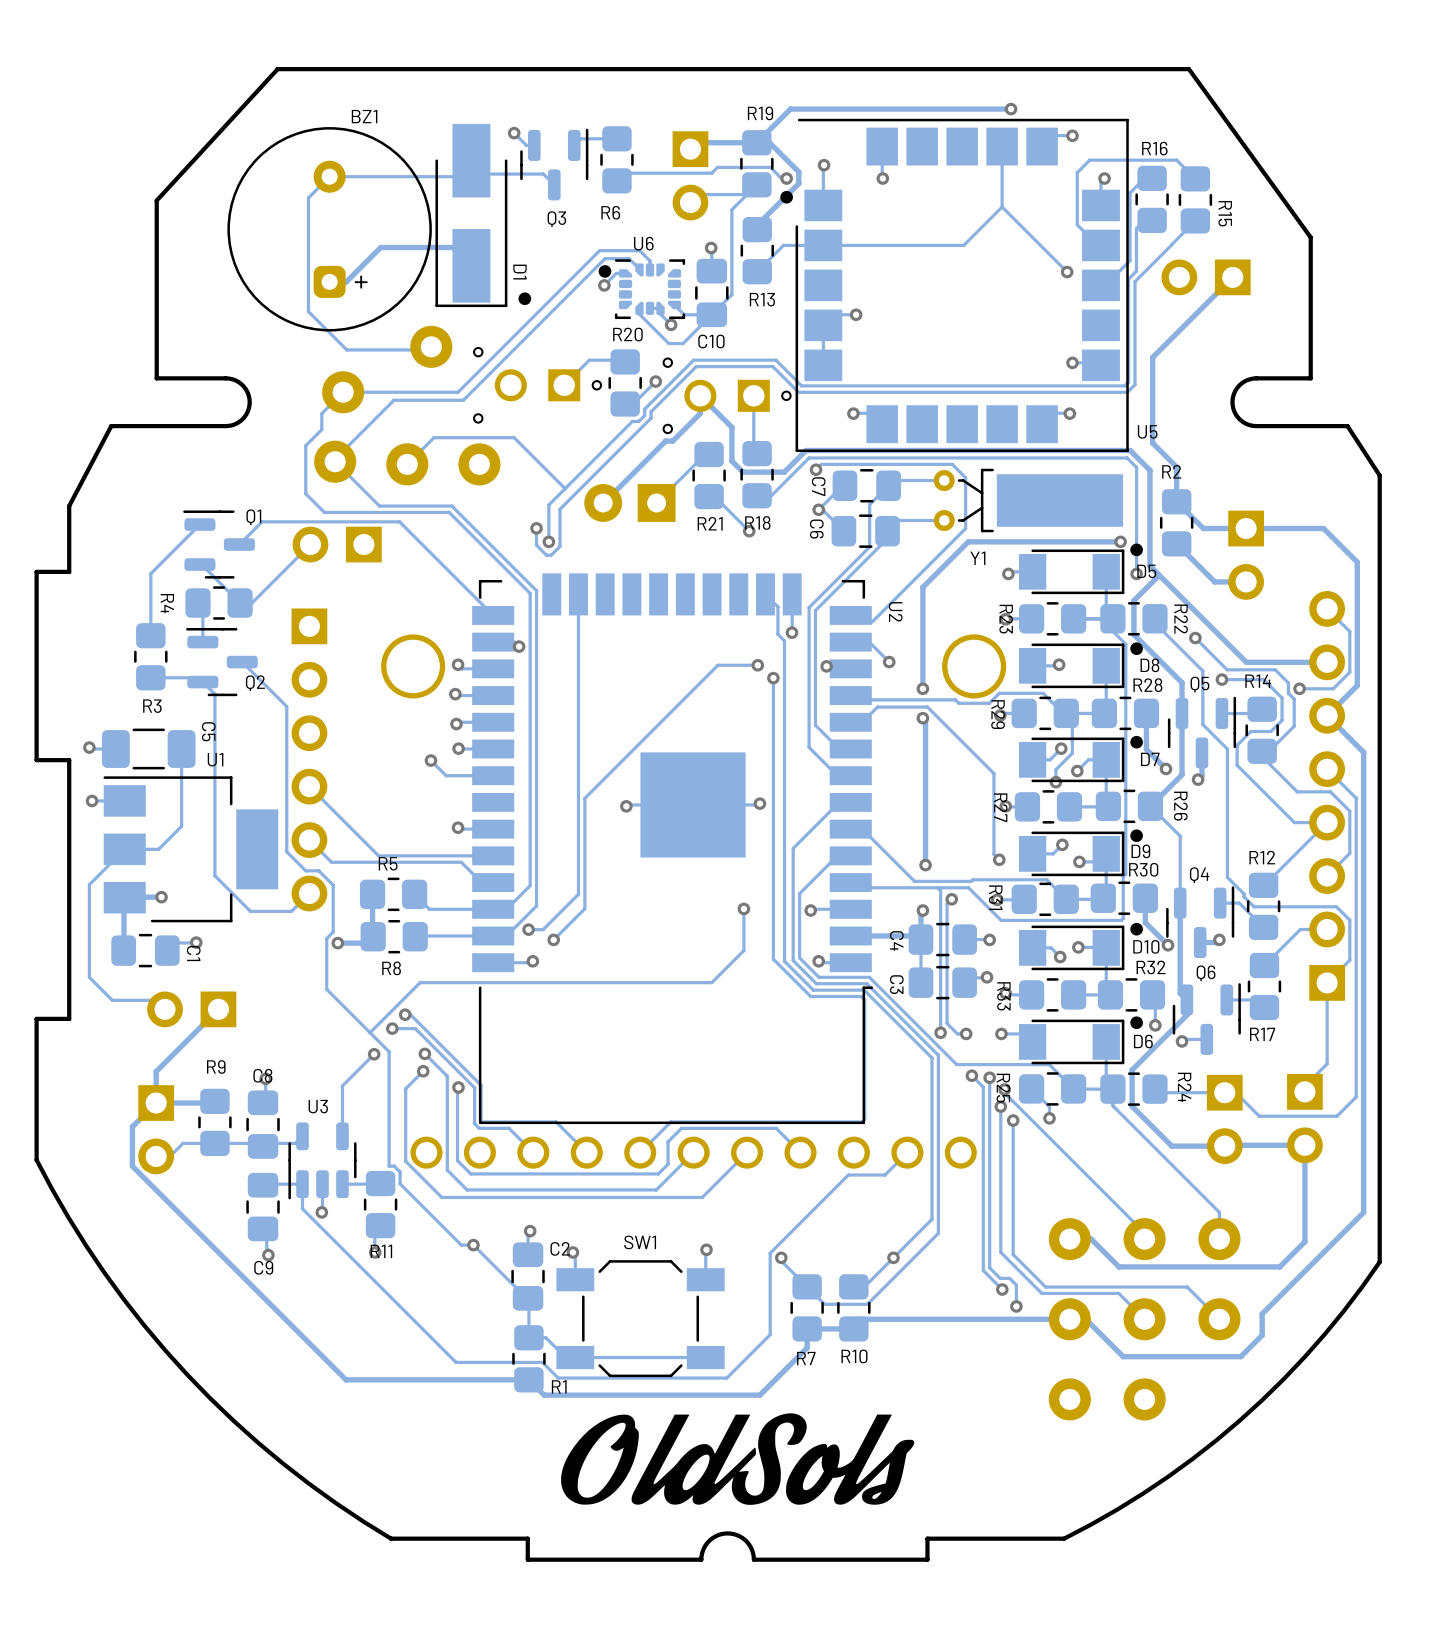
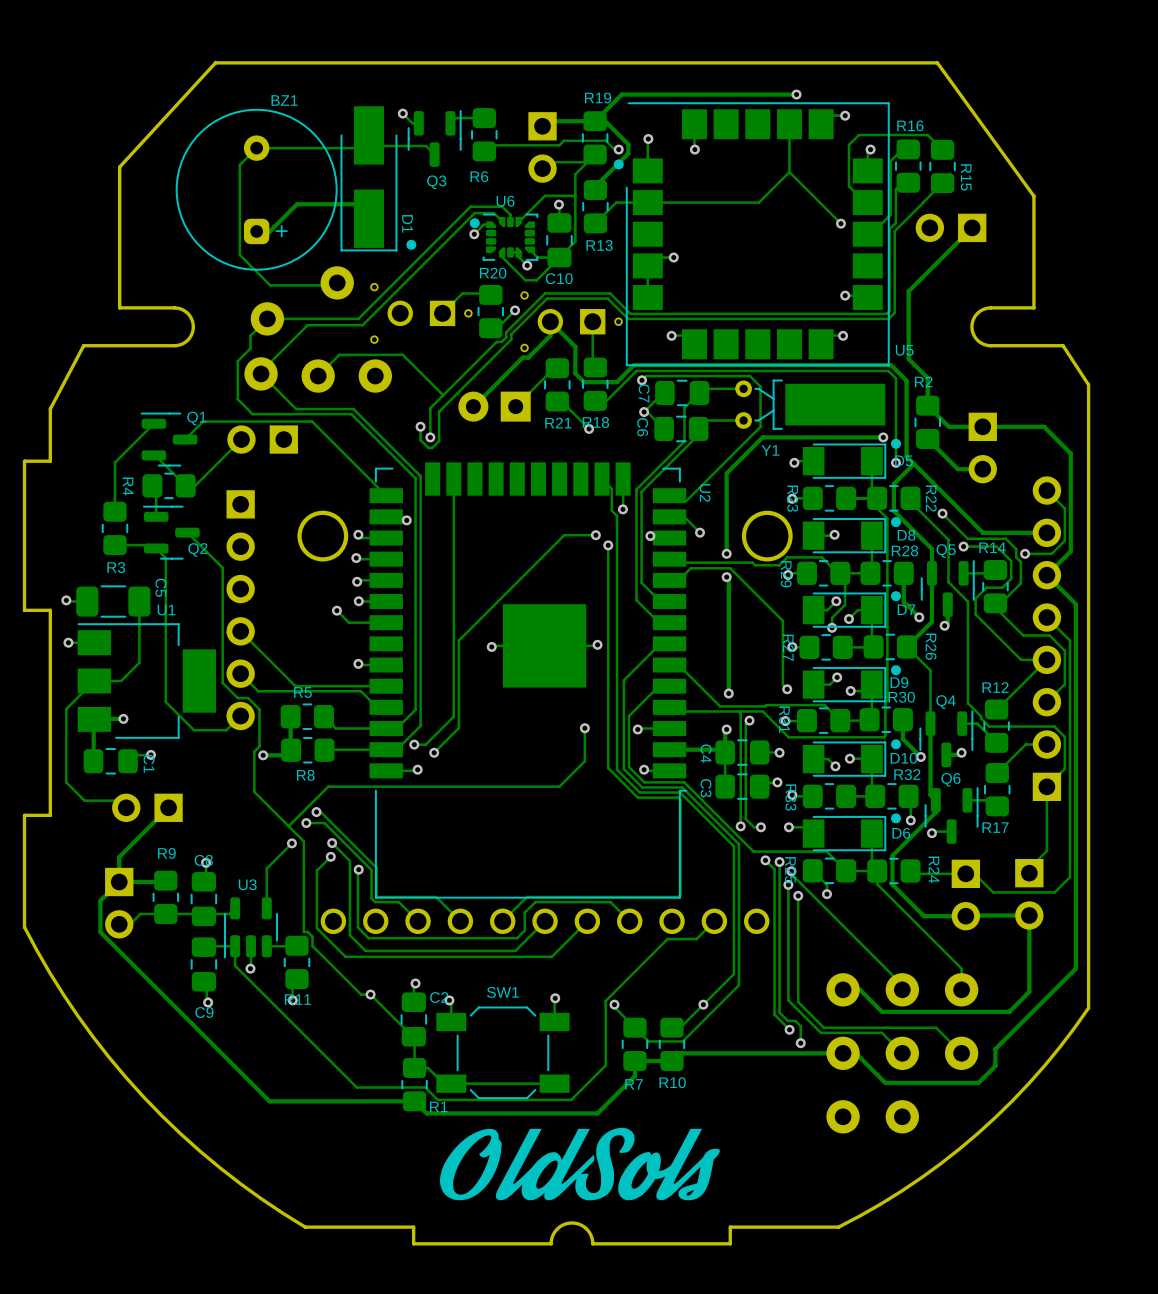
track: none -> (575, 196) (545, 195) (518, 222)

